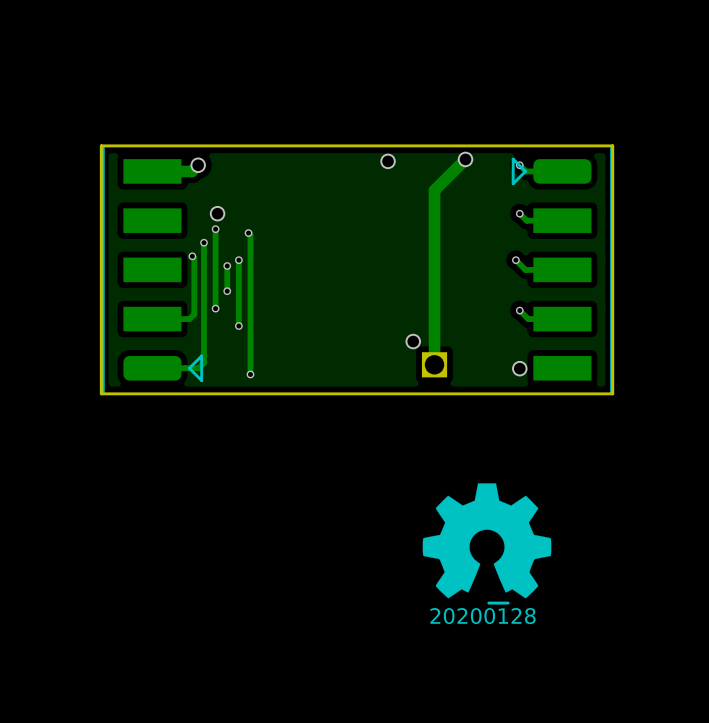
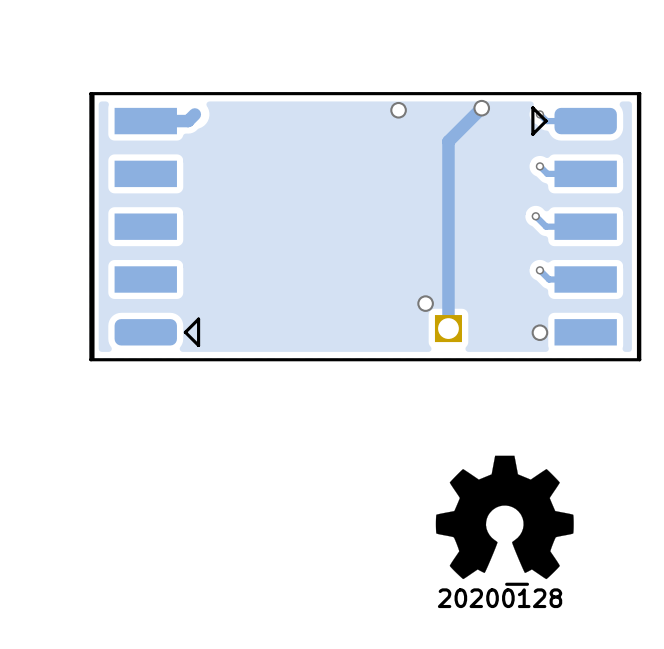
via: (198, 165) -> none
via: (217, 213) -> none
track: (215, 229) (215, 308) -> none
via: (215, 229) -> none
track: (248, 233) (250, 234) (250, 374) -> none
via: (248, 233) -> none
track: (203, 242) (203, 362) (198, 368) (152, 368) -> none
via: (203, 242) -> none
track: (192, 256) (194, 258) (194, 314) (189, 319) (152, 319) -> none
via: (192, 256) -> none
track: (238, 260) (238, 326) -> none
via: (238, 260) -> none
track: (227, 265) (227, 291) -> none
via: (227, 265) -> none
via: (227, 291) -> none
via: (215, 308) -> none
via: (238, 326) -> none
via: (250, 374) -> none

